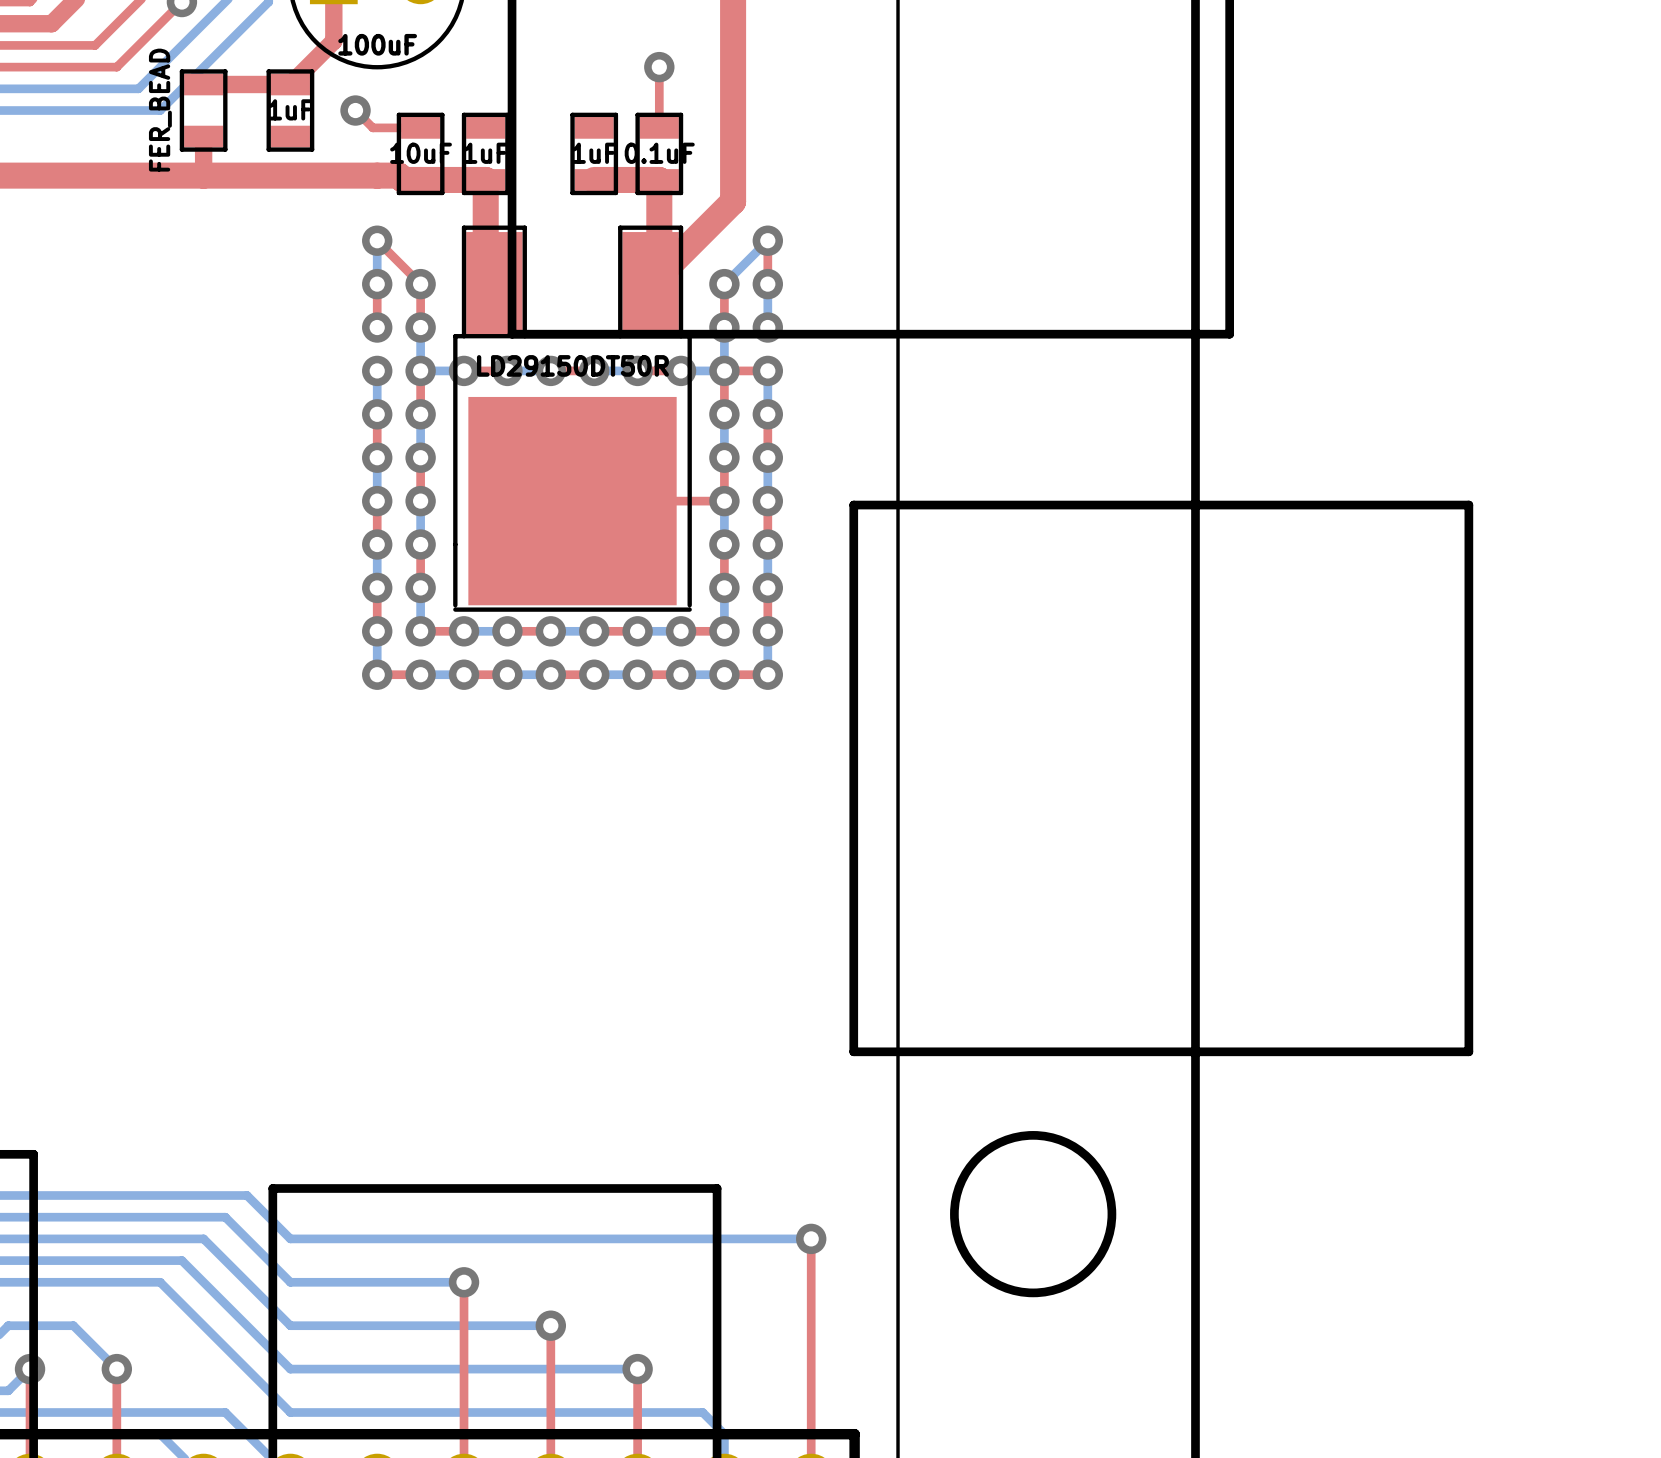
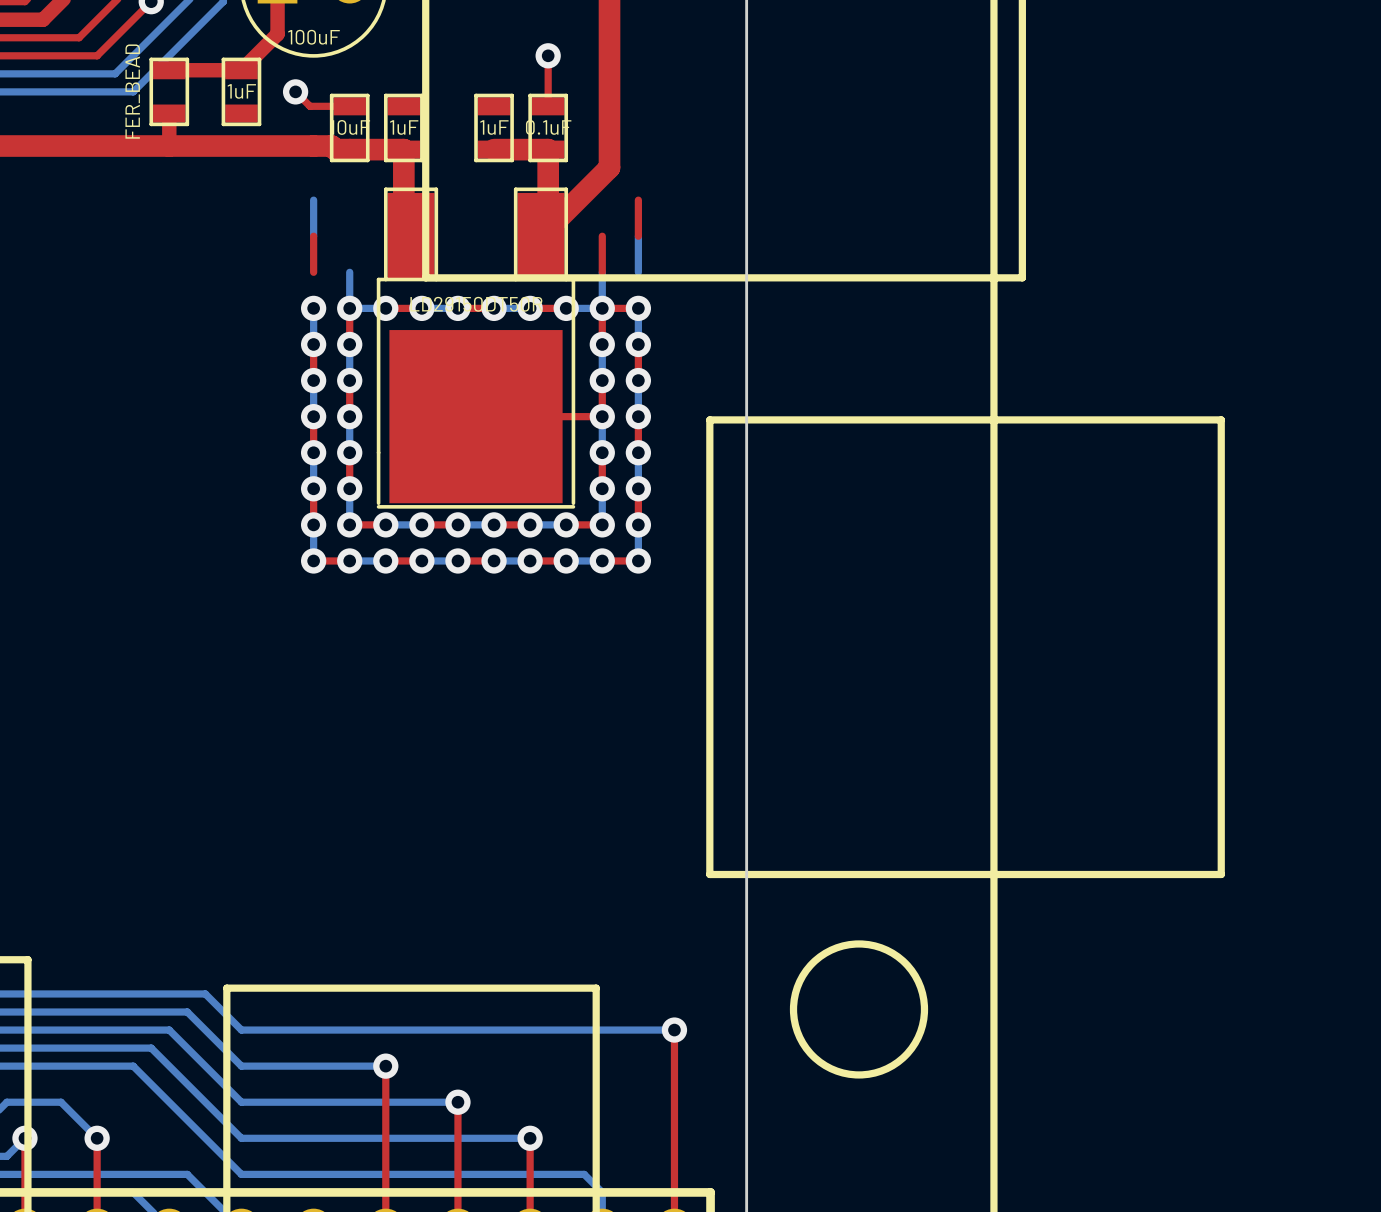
top track: (377, 240) (420, 284) (420, 327) -> none
via: (377, 240) -> none
bottom track: (767, 240) (724, 284) -> none
via: (767, 240) -> none
via: (377, 284) -> none
via: (420, 284) -> none
via: (724, 284) -> none
via: (767, 284) -> none
via: (377, 327) -> none
via: (420, 327) -> none
via: (724, 327) -> none
via: (767, 327) -> none

